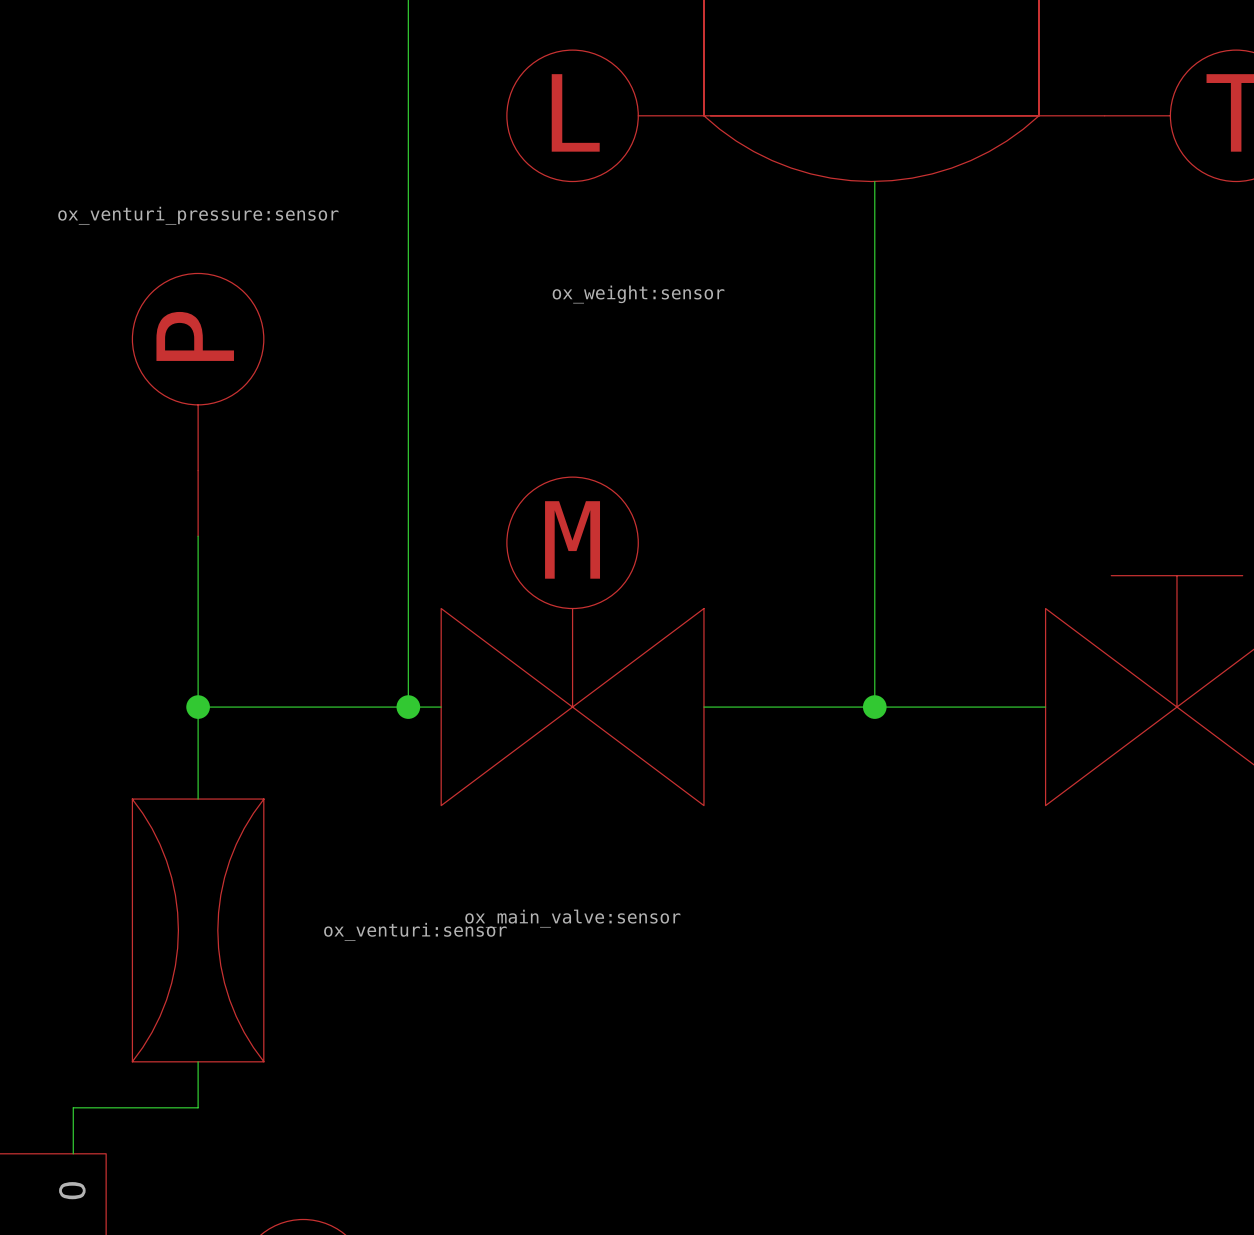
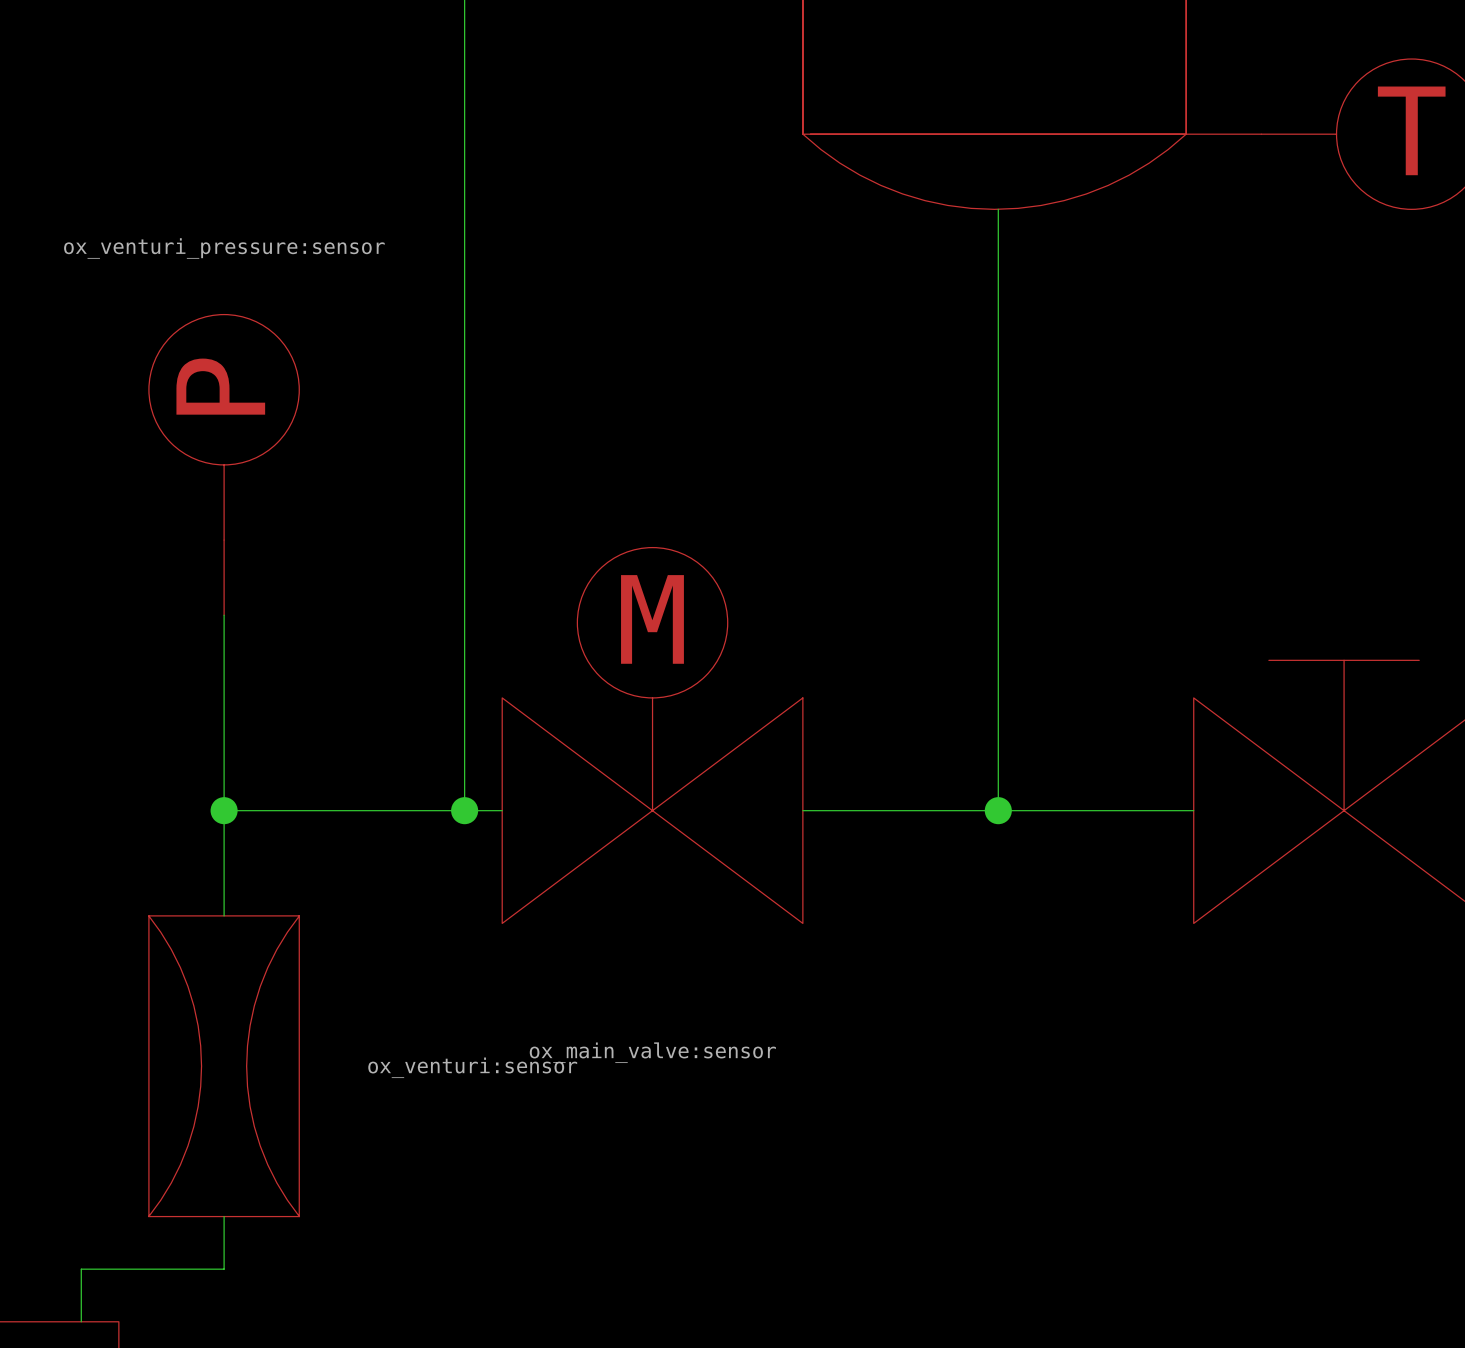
part: ox_weight:sensor (605, 115) -> none

